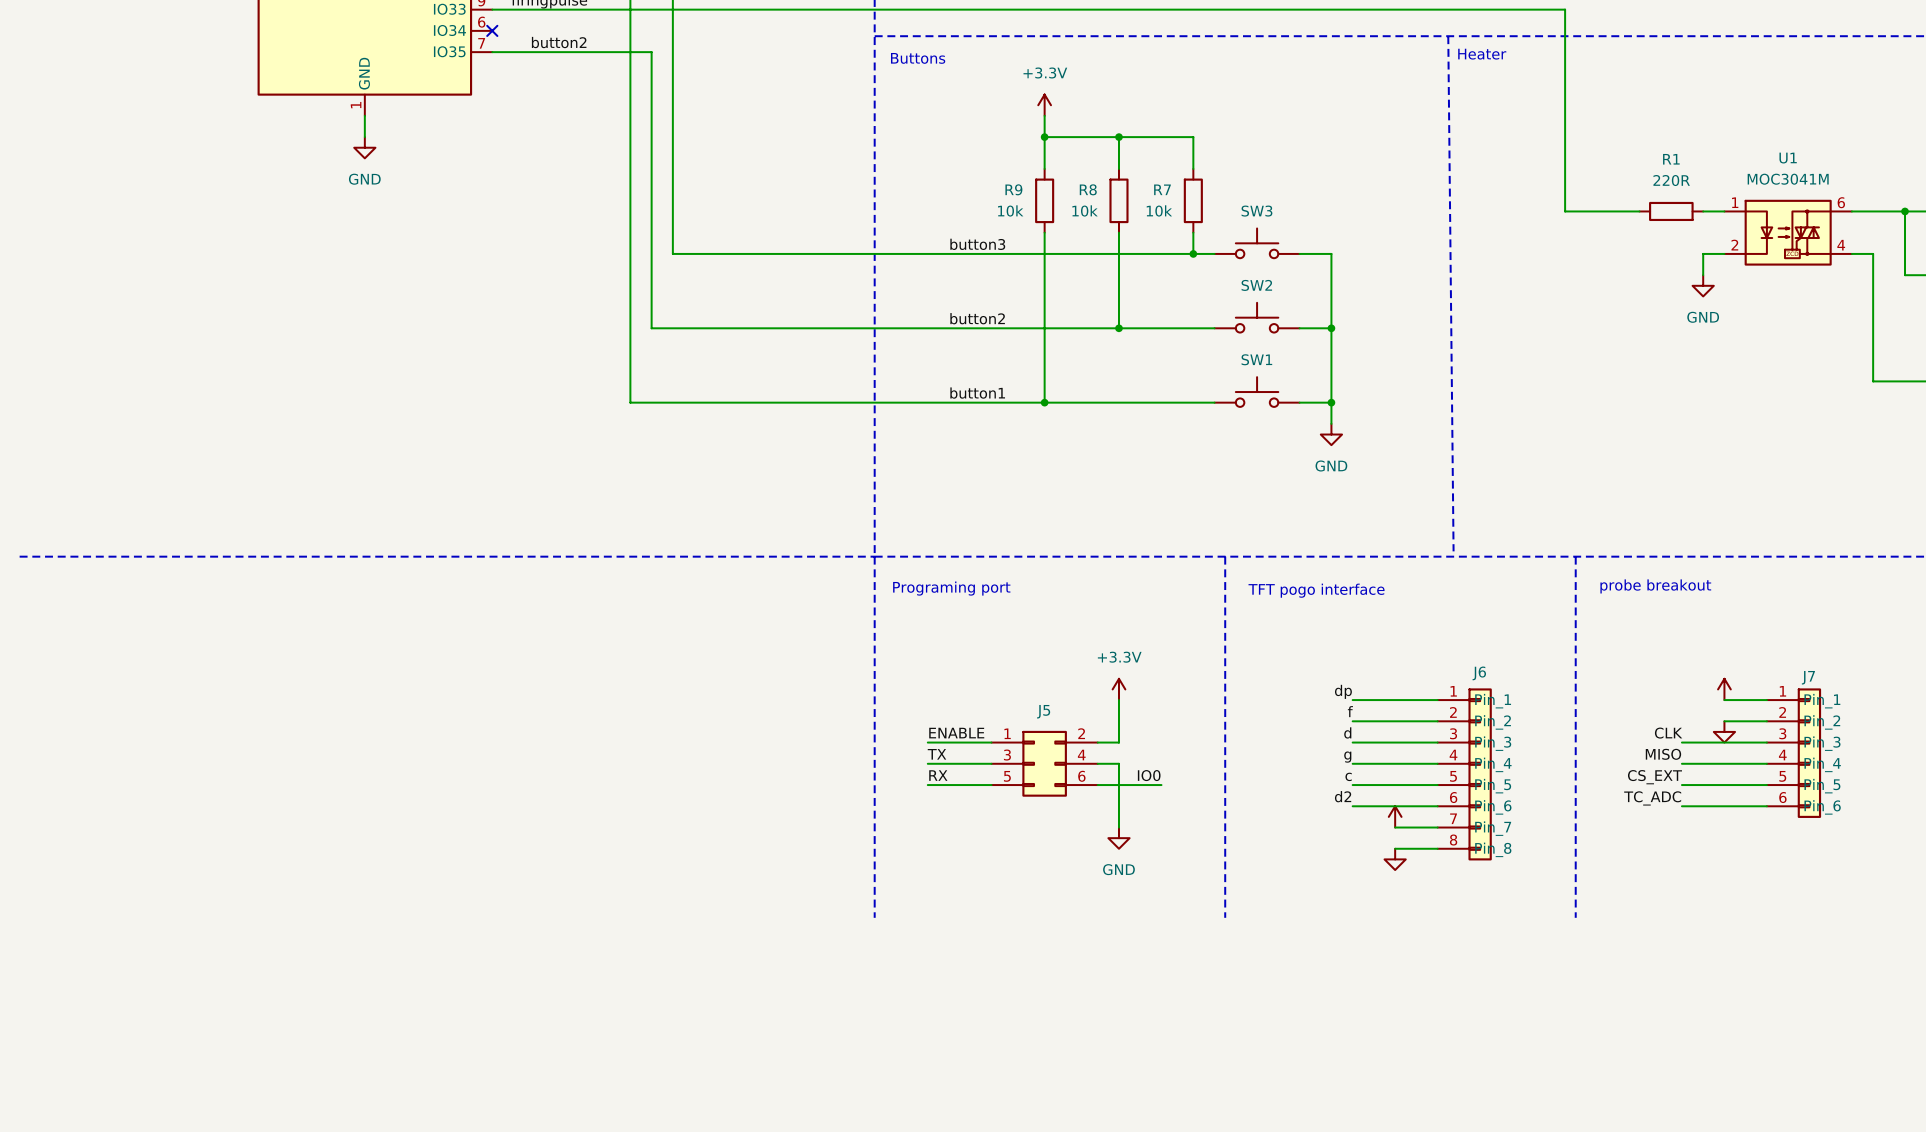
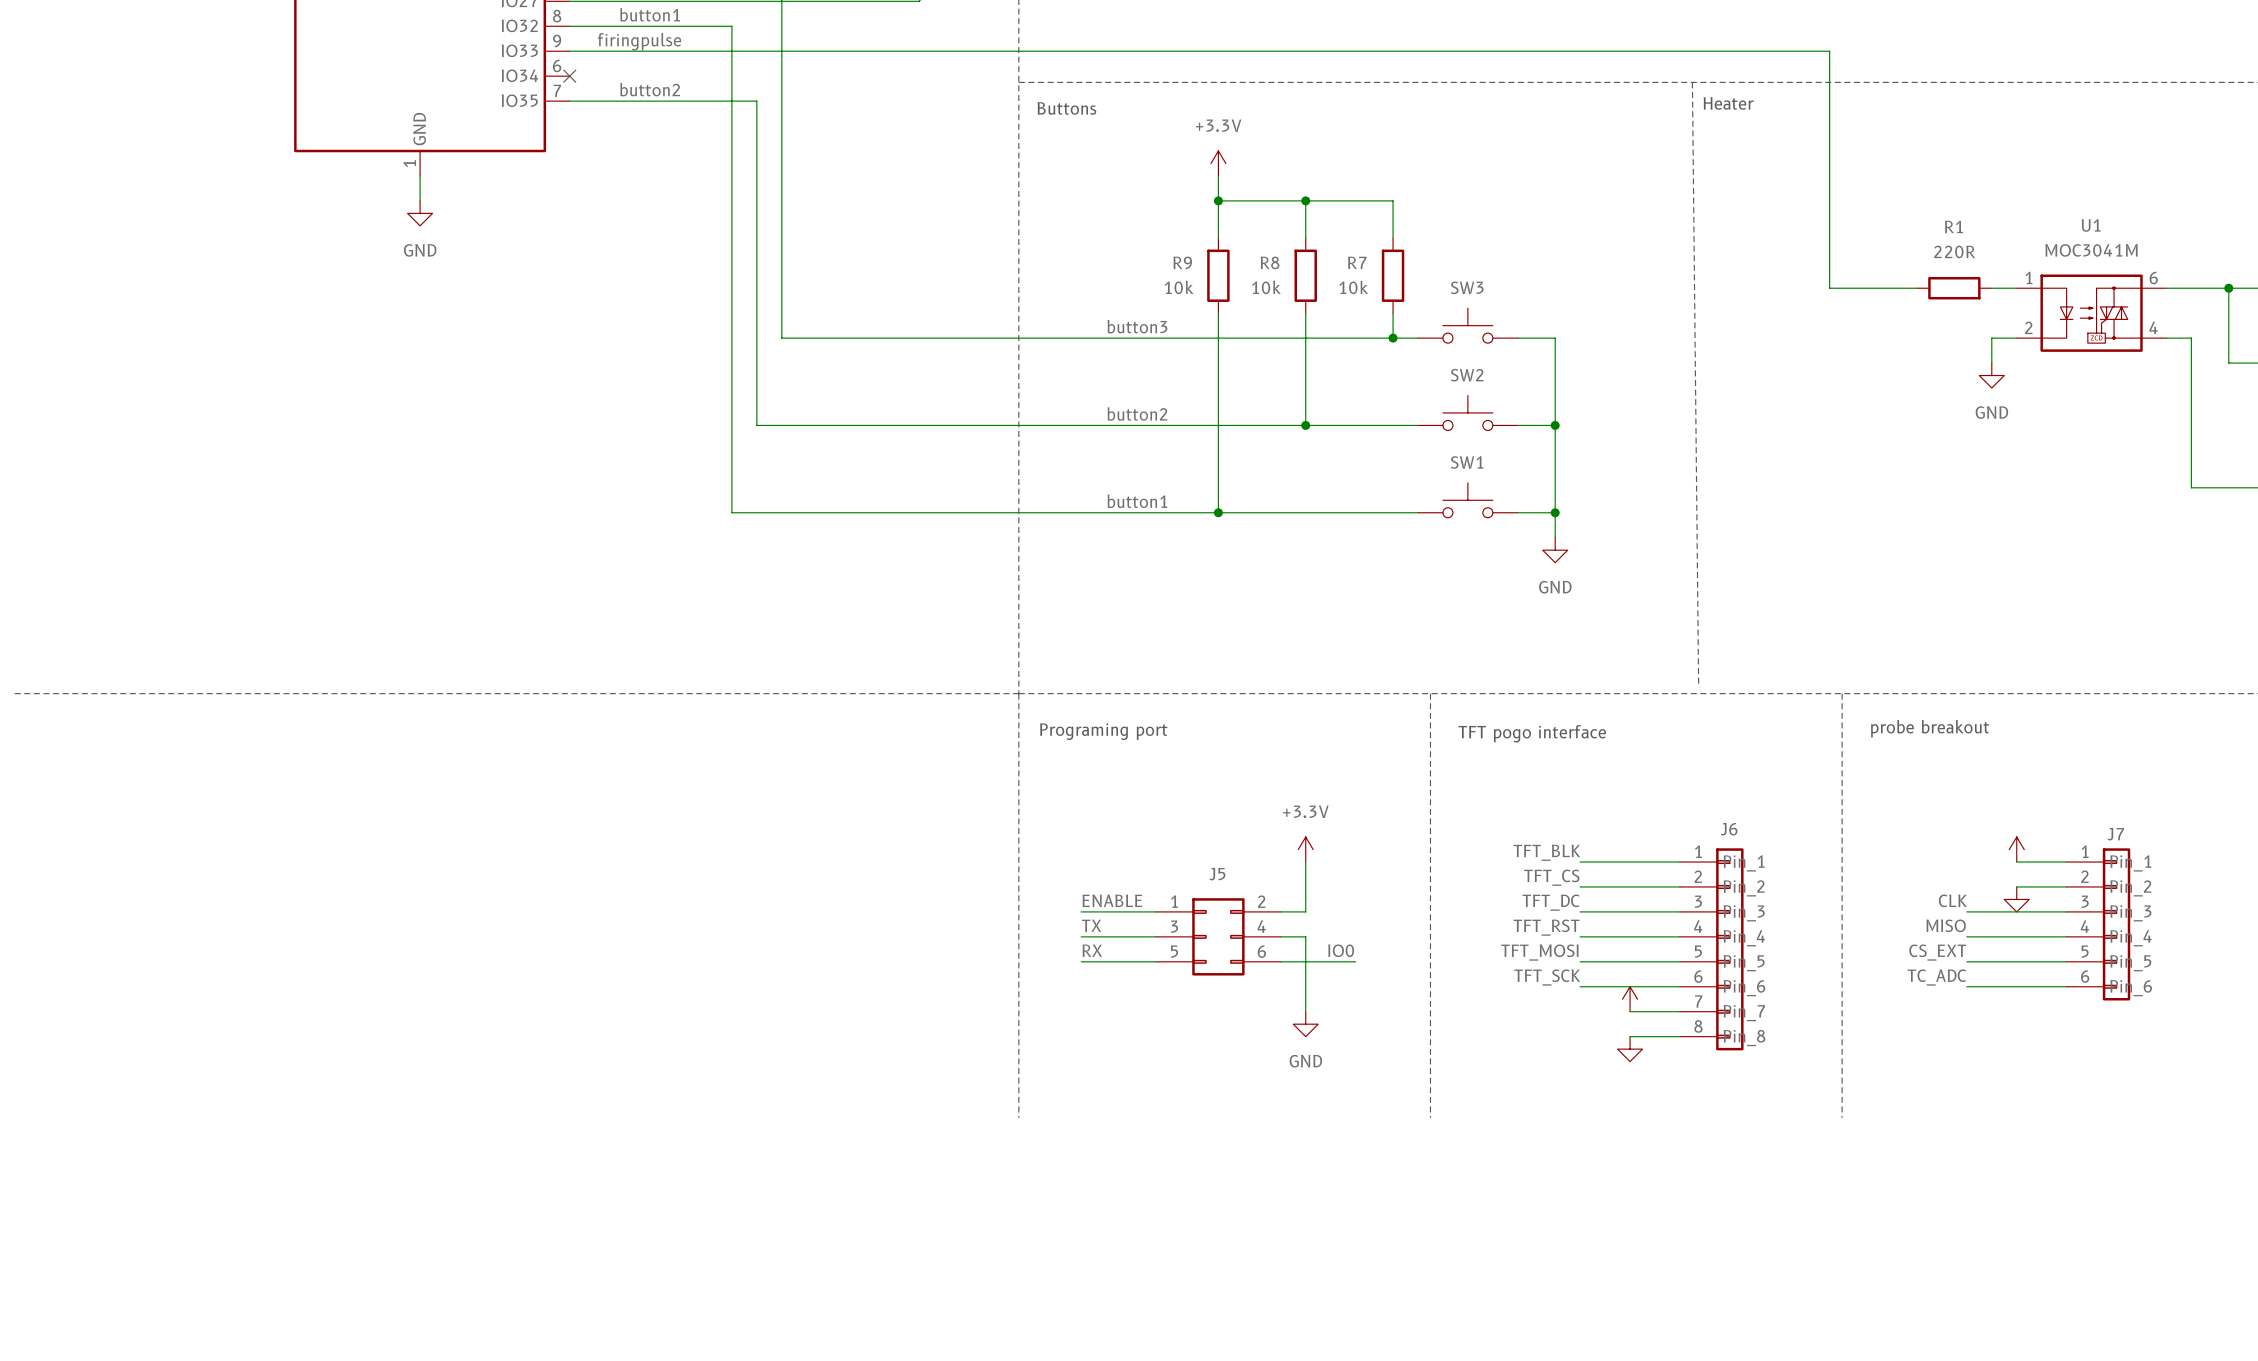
label: dp (1343, 691) -> TFT_BLK (1546, 852)
label: f (1350, 711) -> TFT_CS (1551, 877)
label: d (1347, 732) -> TFT_DC (1551, 902)
label: g (1347, 757) -> TFT_RST (1546, 927)
label: c (1348, 776) -> TFT_MOSI (1539, 952)
label: d2 (1343, 796) -> TFT_SCK (1547, 977)

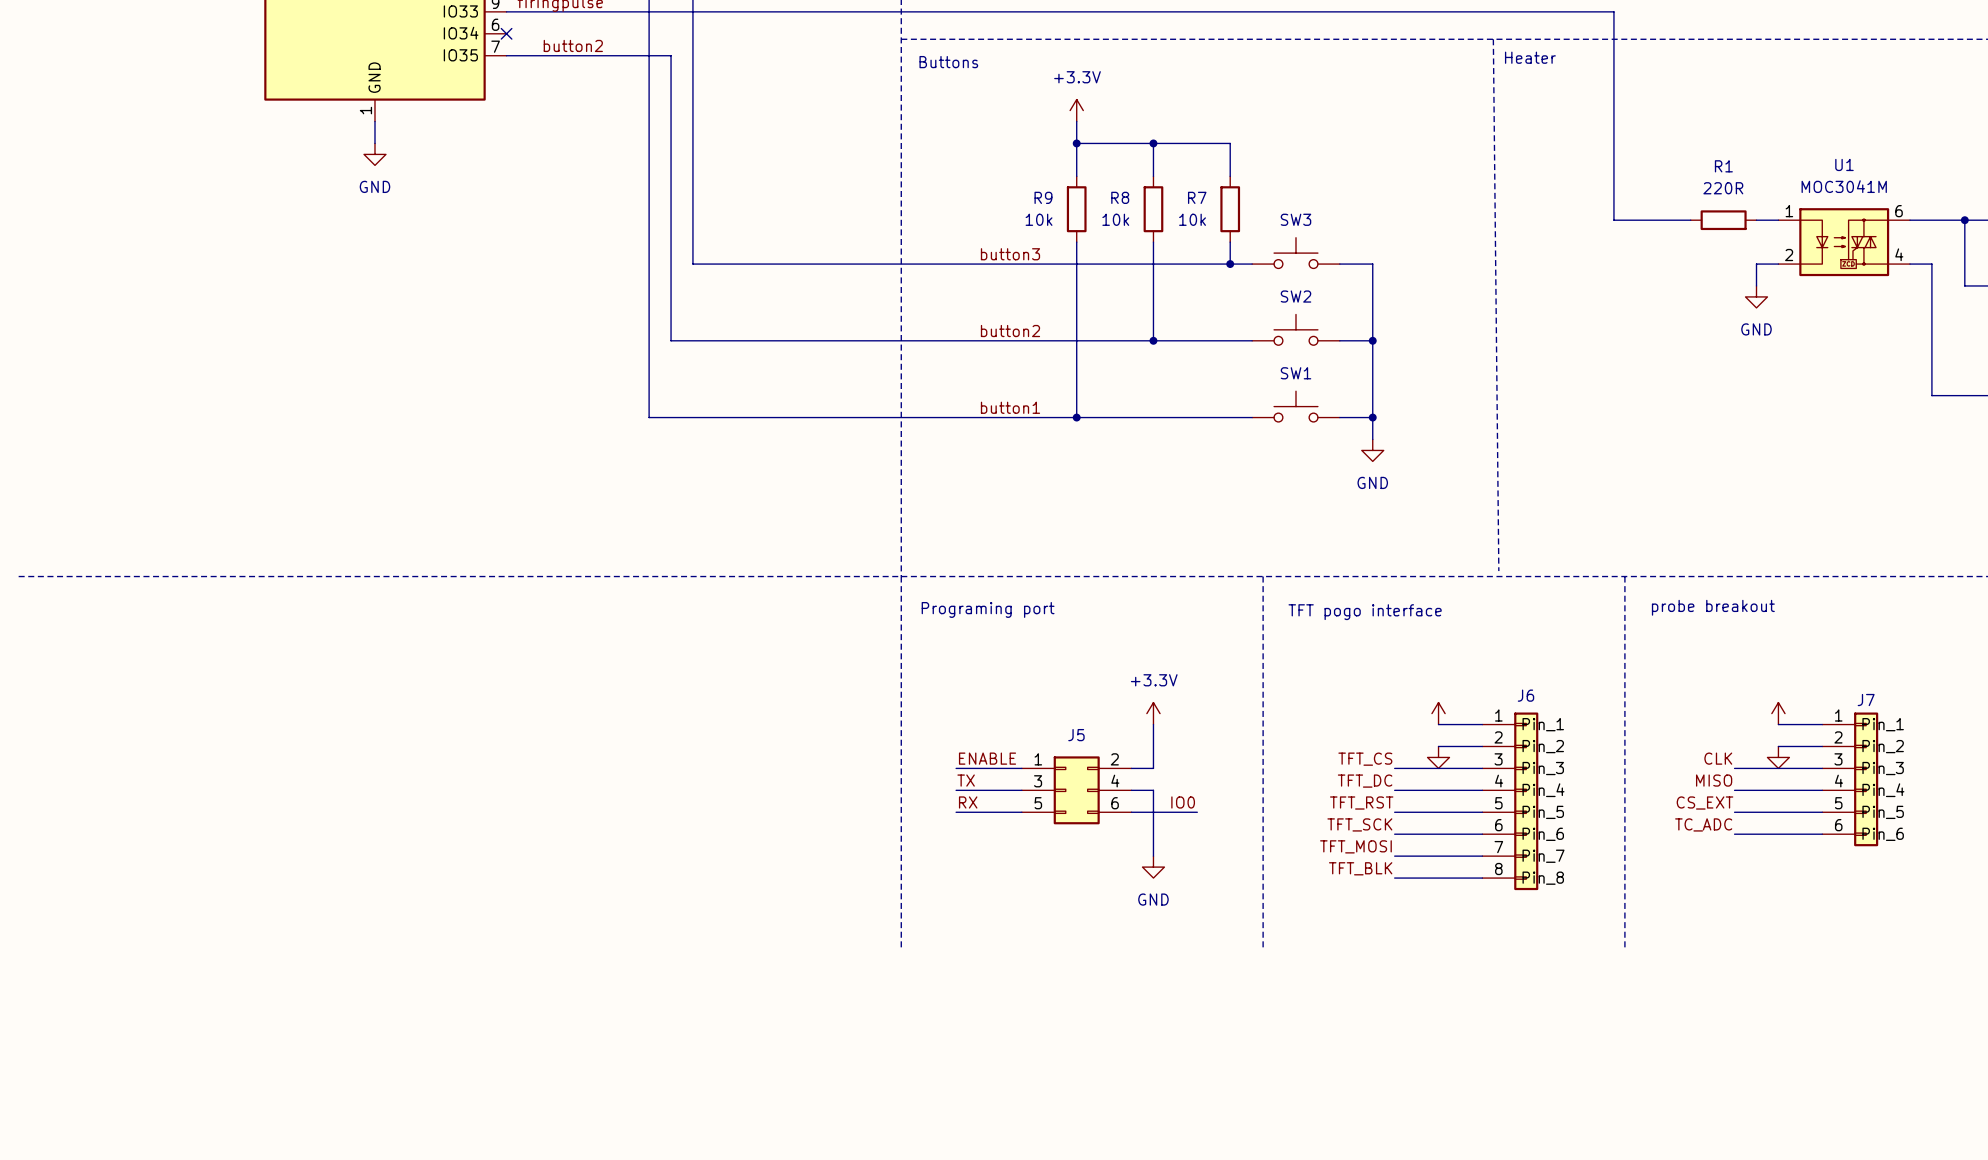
label position: TFT_BLK (1546, 852) -> TFT_BLK (1360, 868)
wire: (1580, 862) (1630, 862) -> (1394, 878) (1438, 878)
label: TFT_CS (1551, 877) -> none
wire: (1580, 886) (1630, 886) -> (1394, 856) (1438, 856)
label: TFT_DC (1551, 902) -> TFT_CS (1365, 759)
label: TFT_RST (1546, 927) -> TFT_DC (1365, 781)
label: TFT_MOSI (1539, 952) -> TFT_RST (1361, 803)
power symbol position: (1630, 999) -> (1438, 713)
label: none -> TFT_MOSI (1355, 846)
power symbol position: (1630, 1049) -> (1438, 757)

